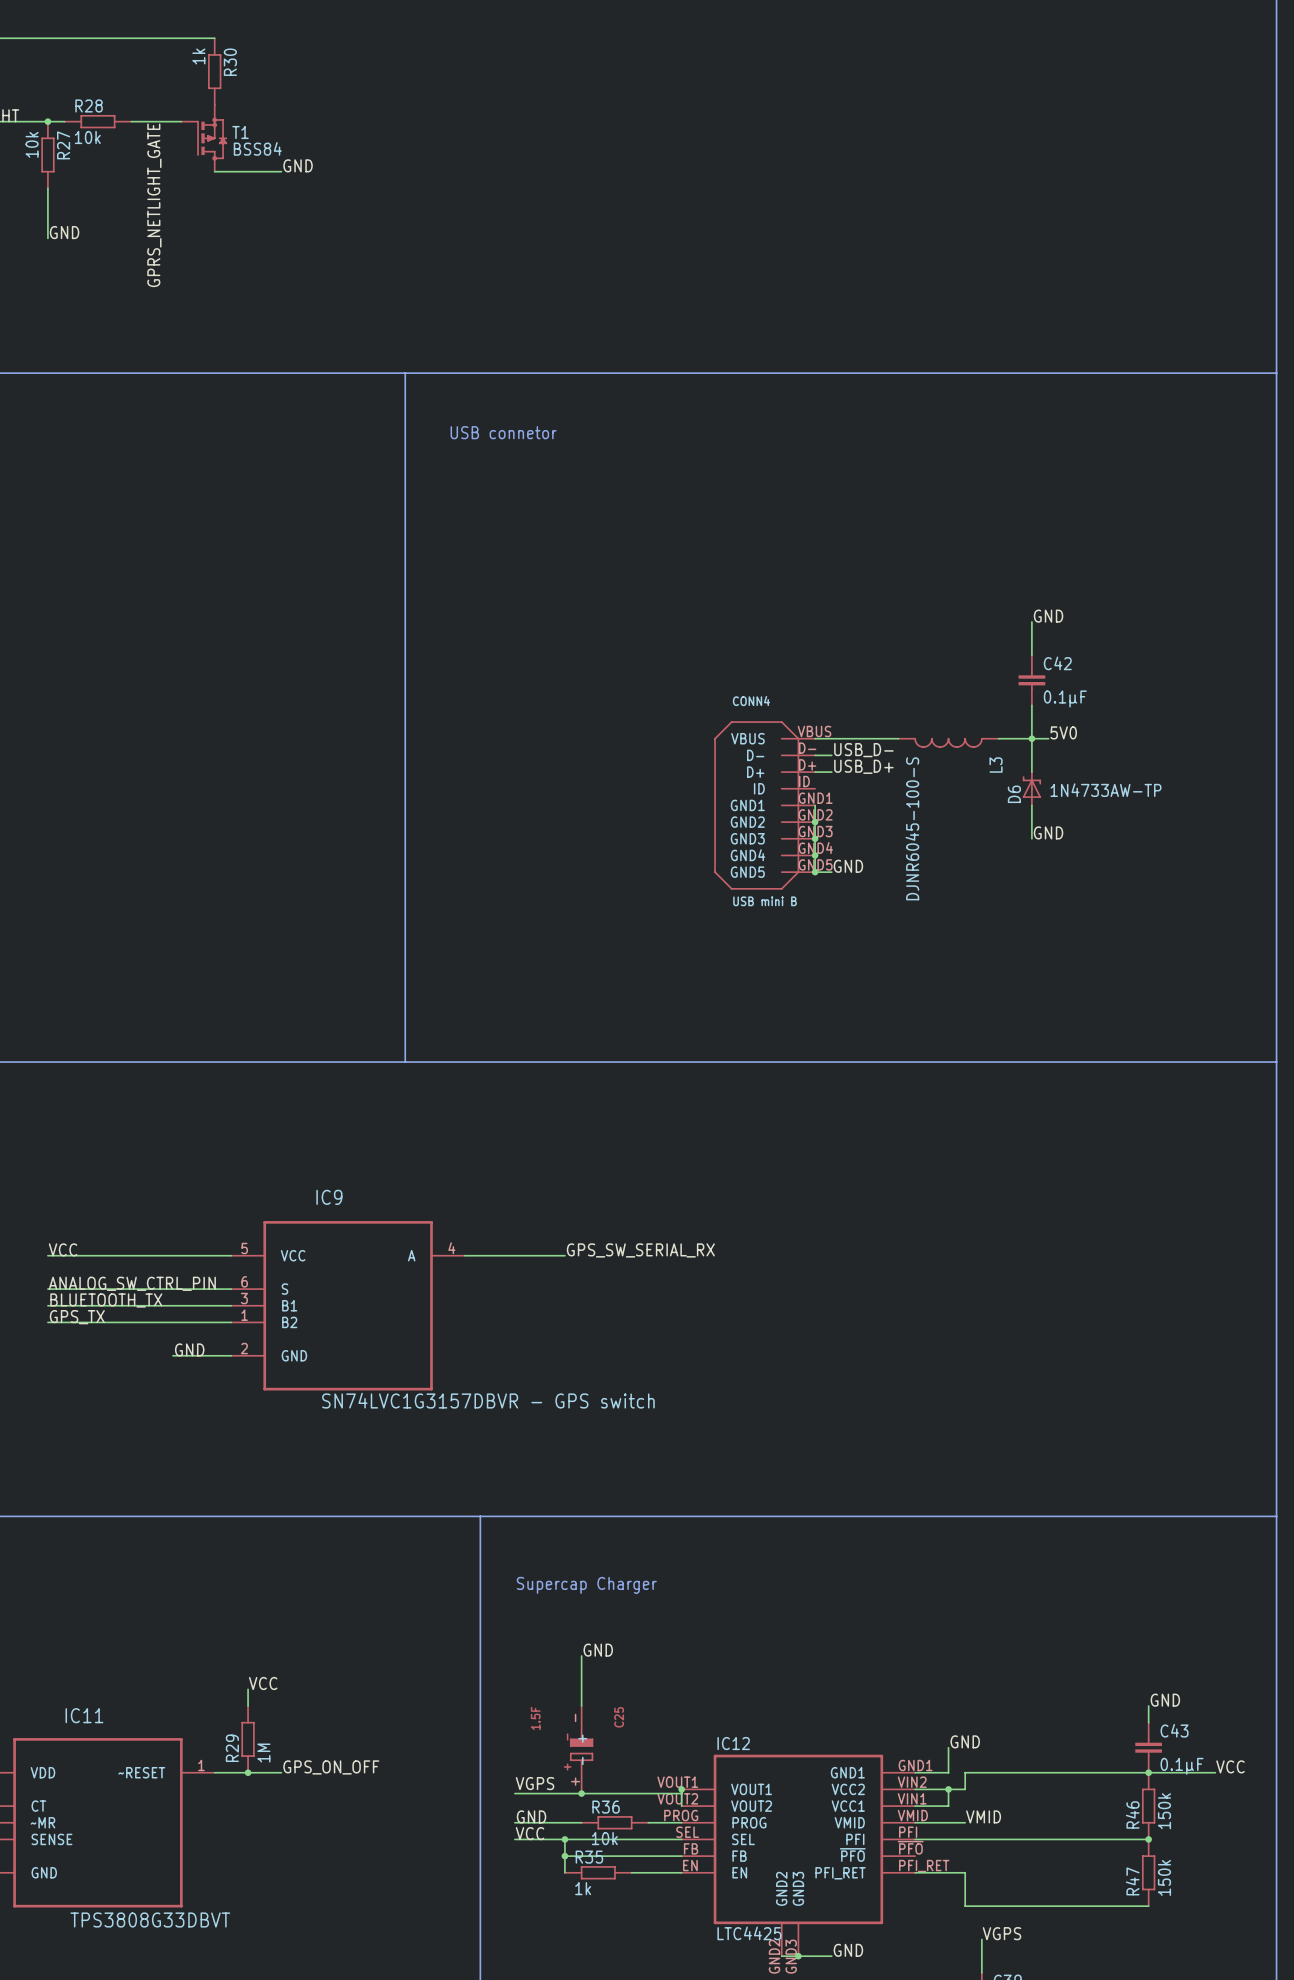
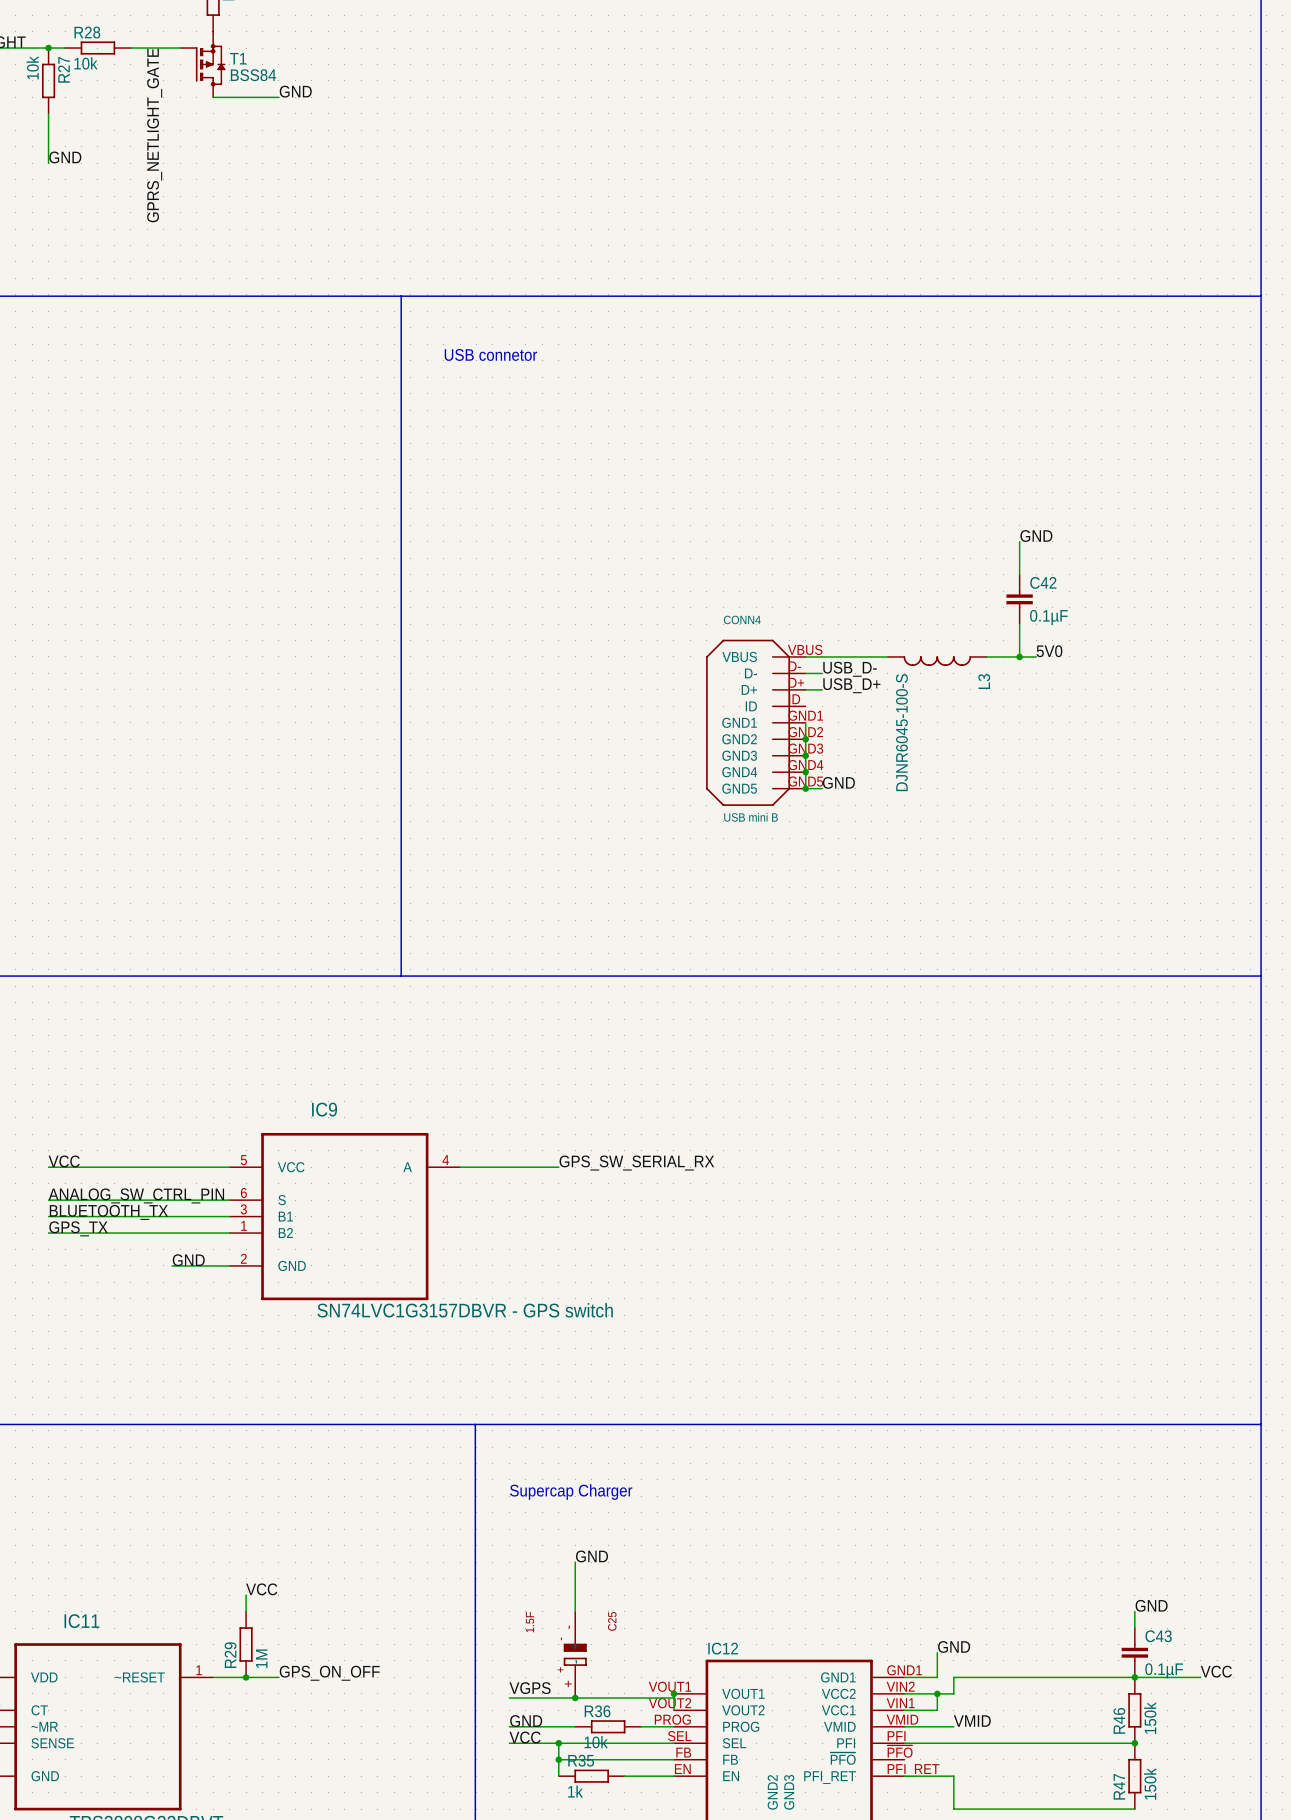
wire: (1031, 738) (1031, 772) -> none
D6: 1N4733AW-TP (1031, 788) -> none
wire: (1031, 805) (1031, 838) -> none
label: GND (1048, 832) -> none

